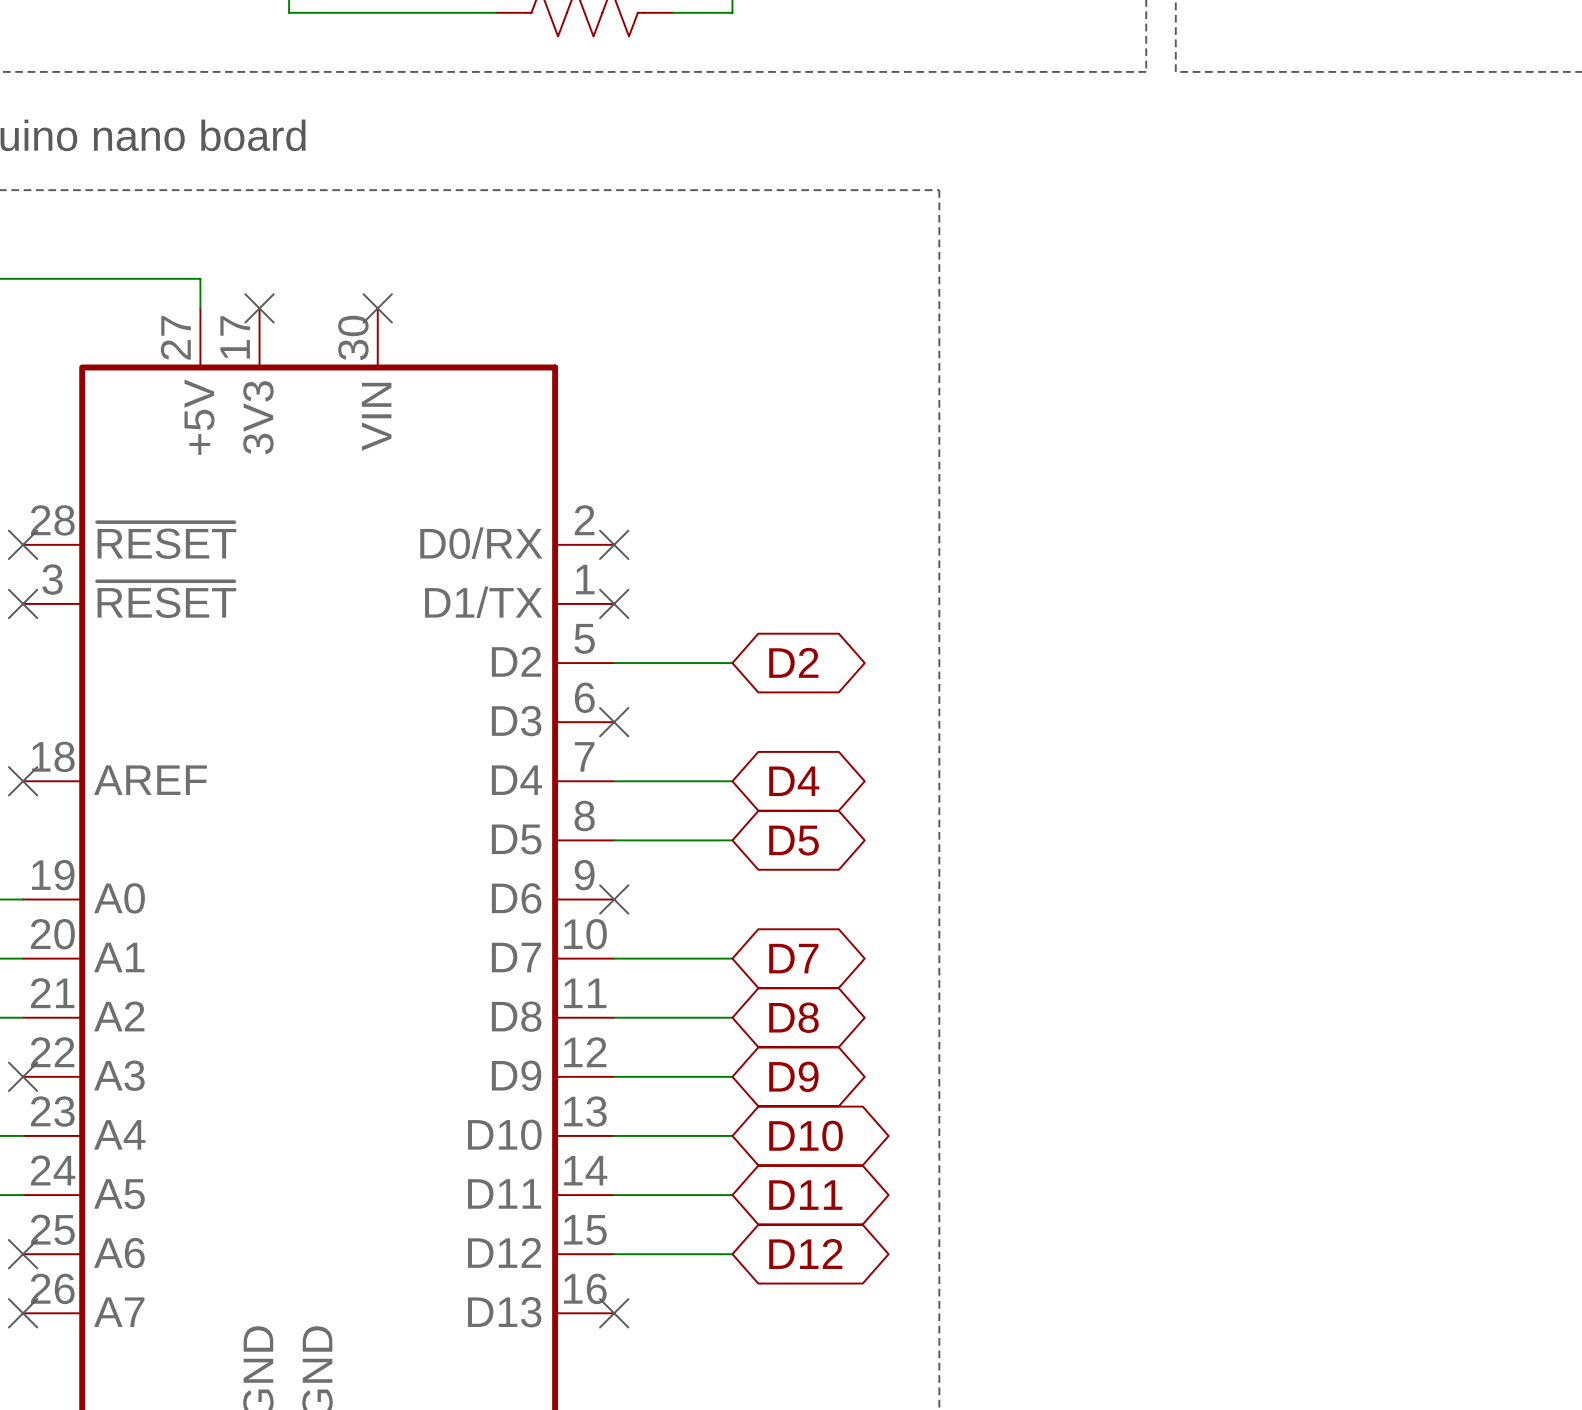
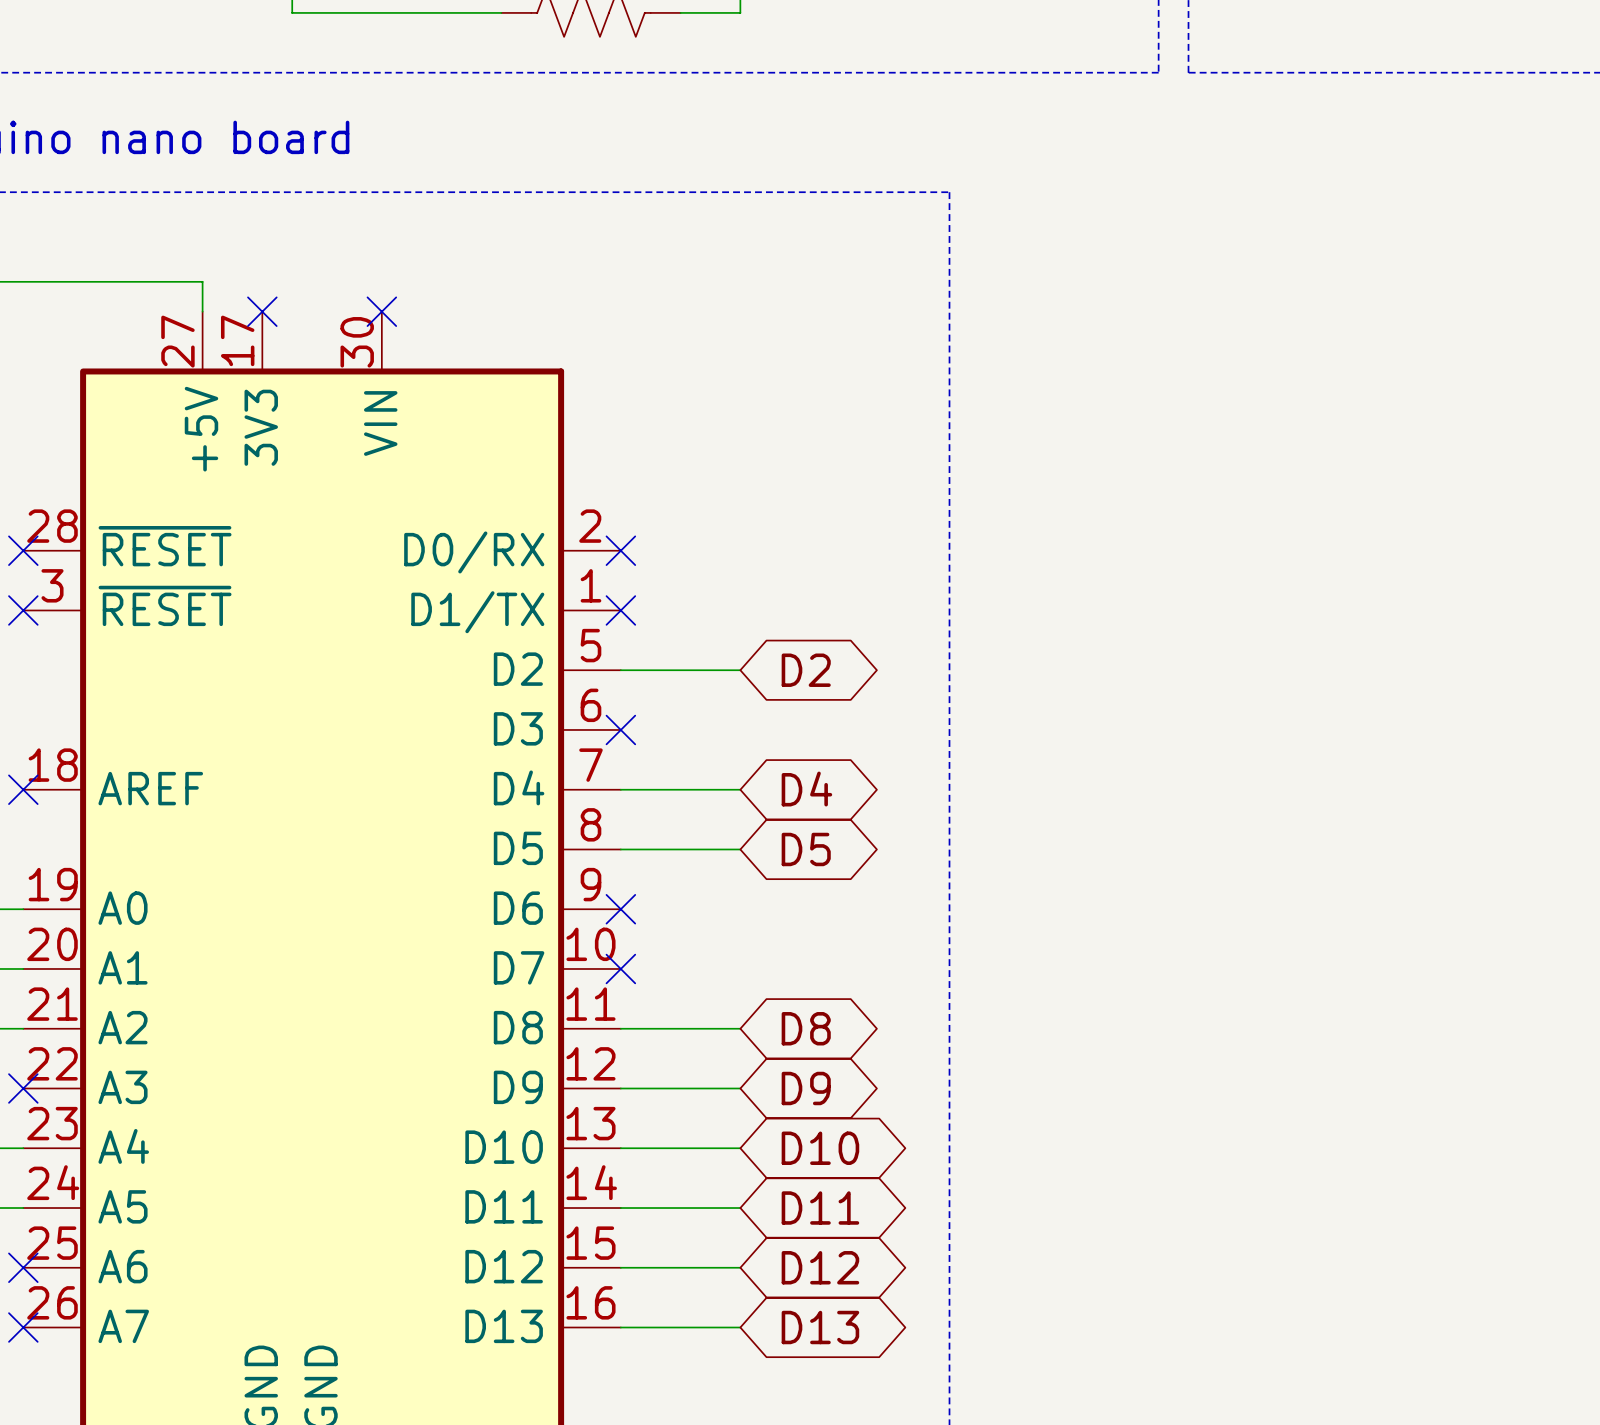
wire: (614, 958) (732, 958) -> (620, 1327) (740, 1327)
no-connect mark: none -> (620, 968)
global label: D7 (793, 958) -> none
no-connect mark: (614, 1313) -> none
global label: none -> D13 (820, 1327)

